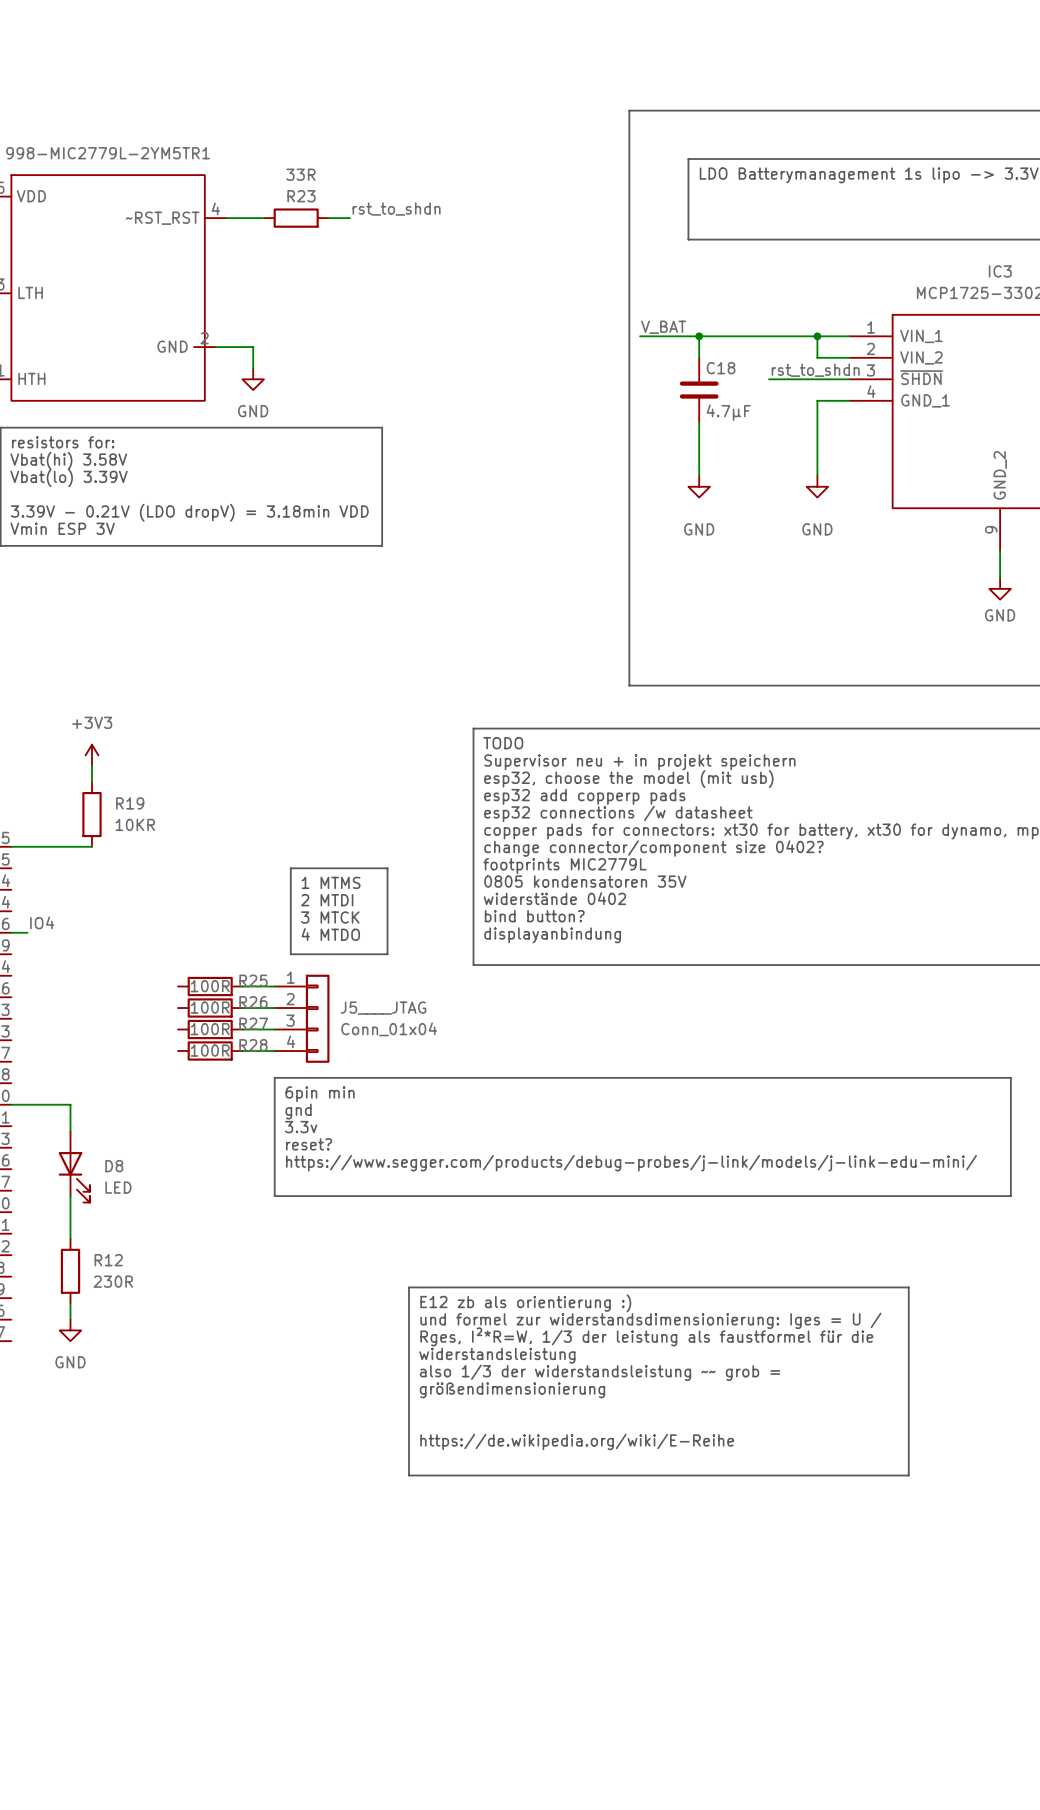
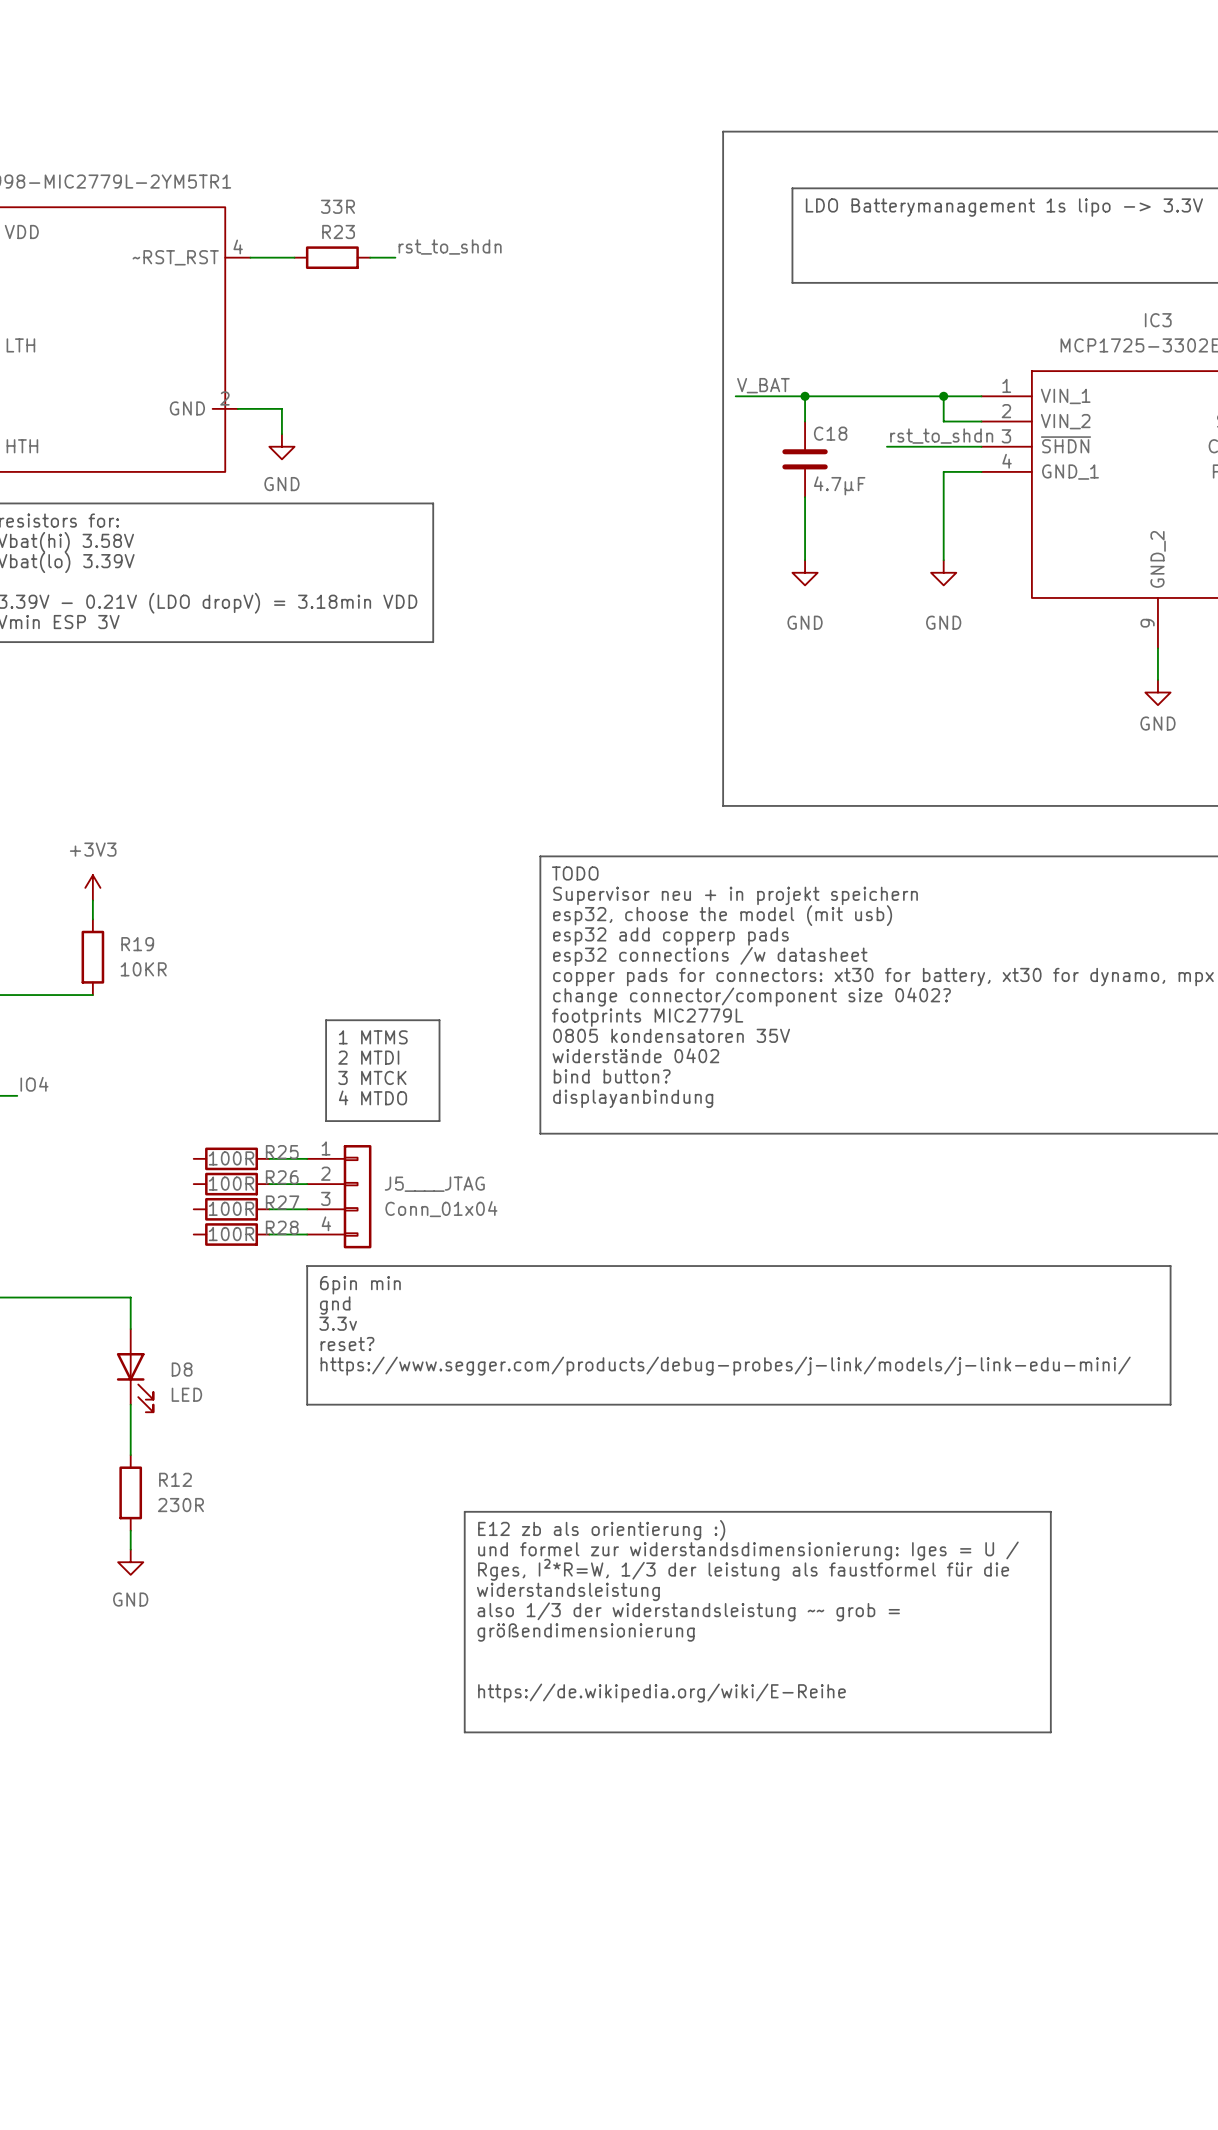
wire: (70, 1104) (70, 1131) -> (67, 1297) (130, 1297) (130, 1329)
D8 position: (74, 1167) -> (135, 1370)
wire: (70, 1196) (70, 1239) -> (130, 1404) (130, 1455)
R12 position: (70, 1271) -> (130, 1492)
wire: (70, 1303) (70, 1319) -> (130, 1530) (130, 1549)
power symbol position: GND (70, 1330) -> GND (130, 1562)

